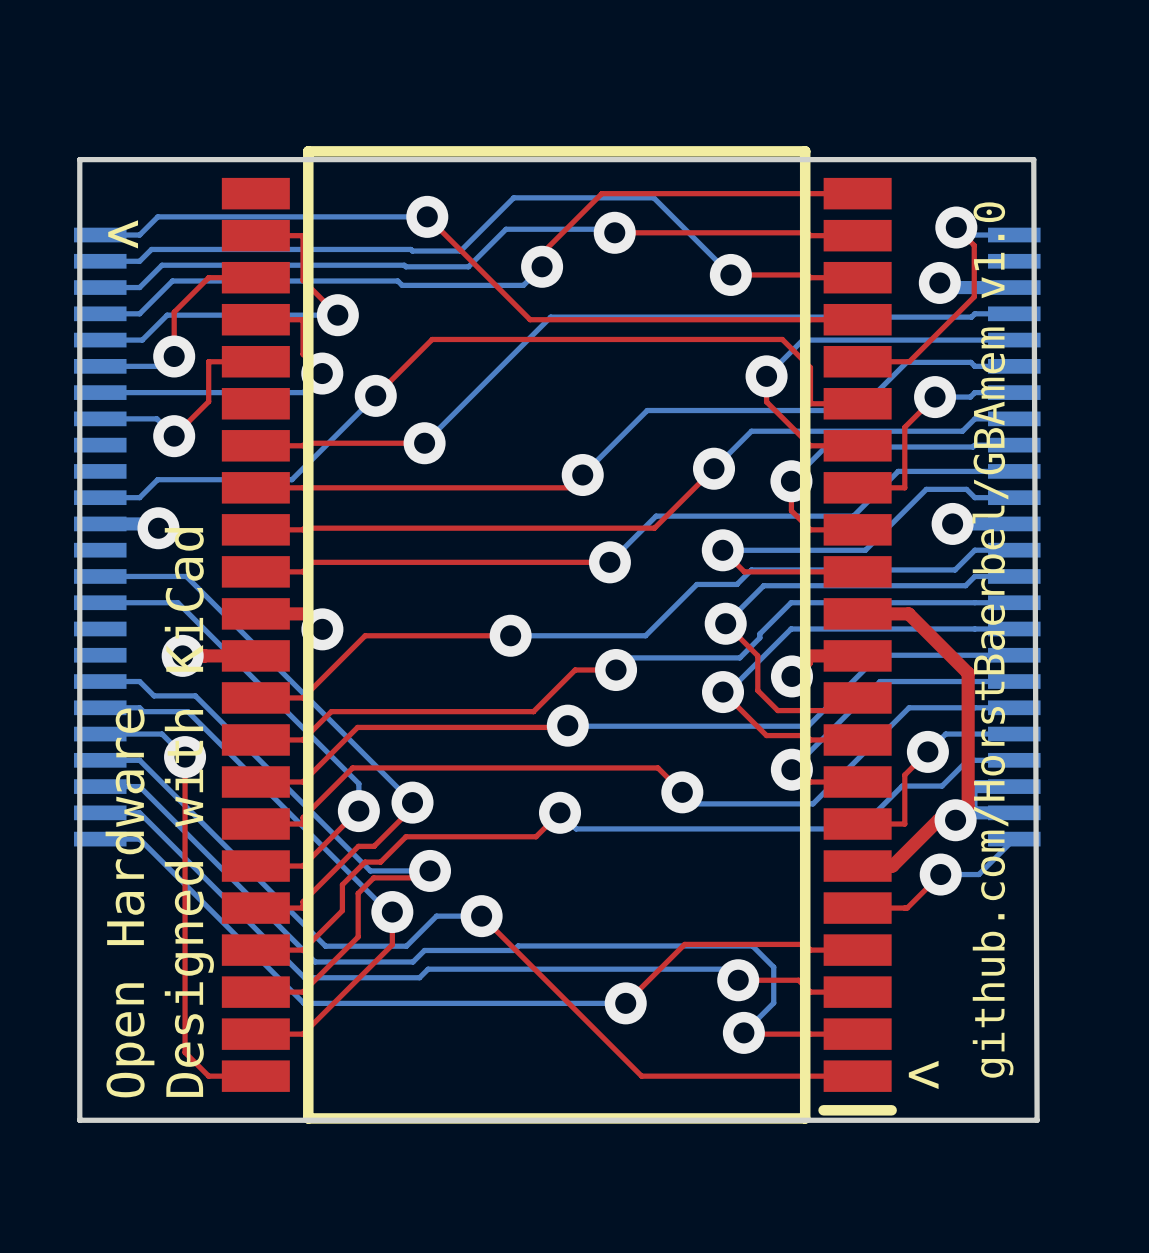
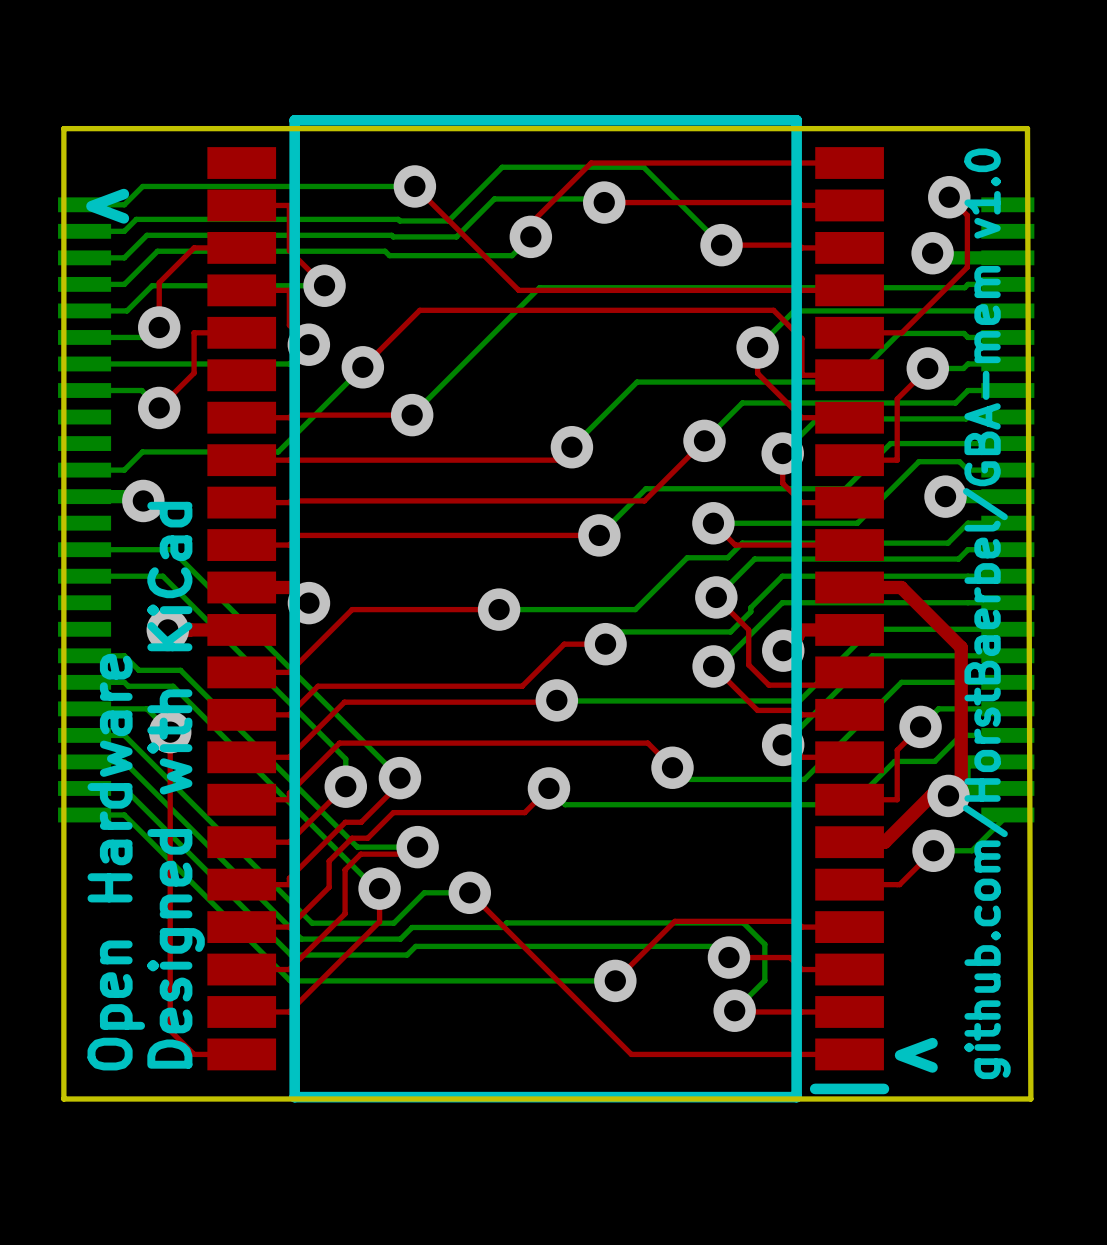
text: github.com/HorstBaerbel/GBAmem v1.0 (993, 640) -> github.com/HorstBaerbel/GBA-mem v1.0 (986, 613)

